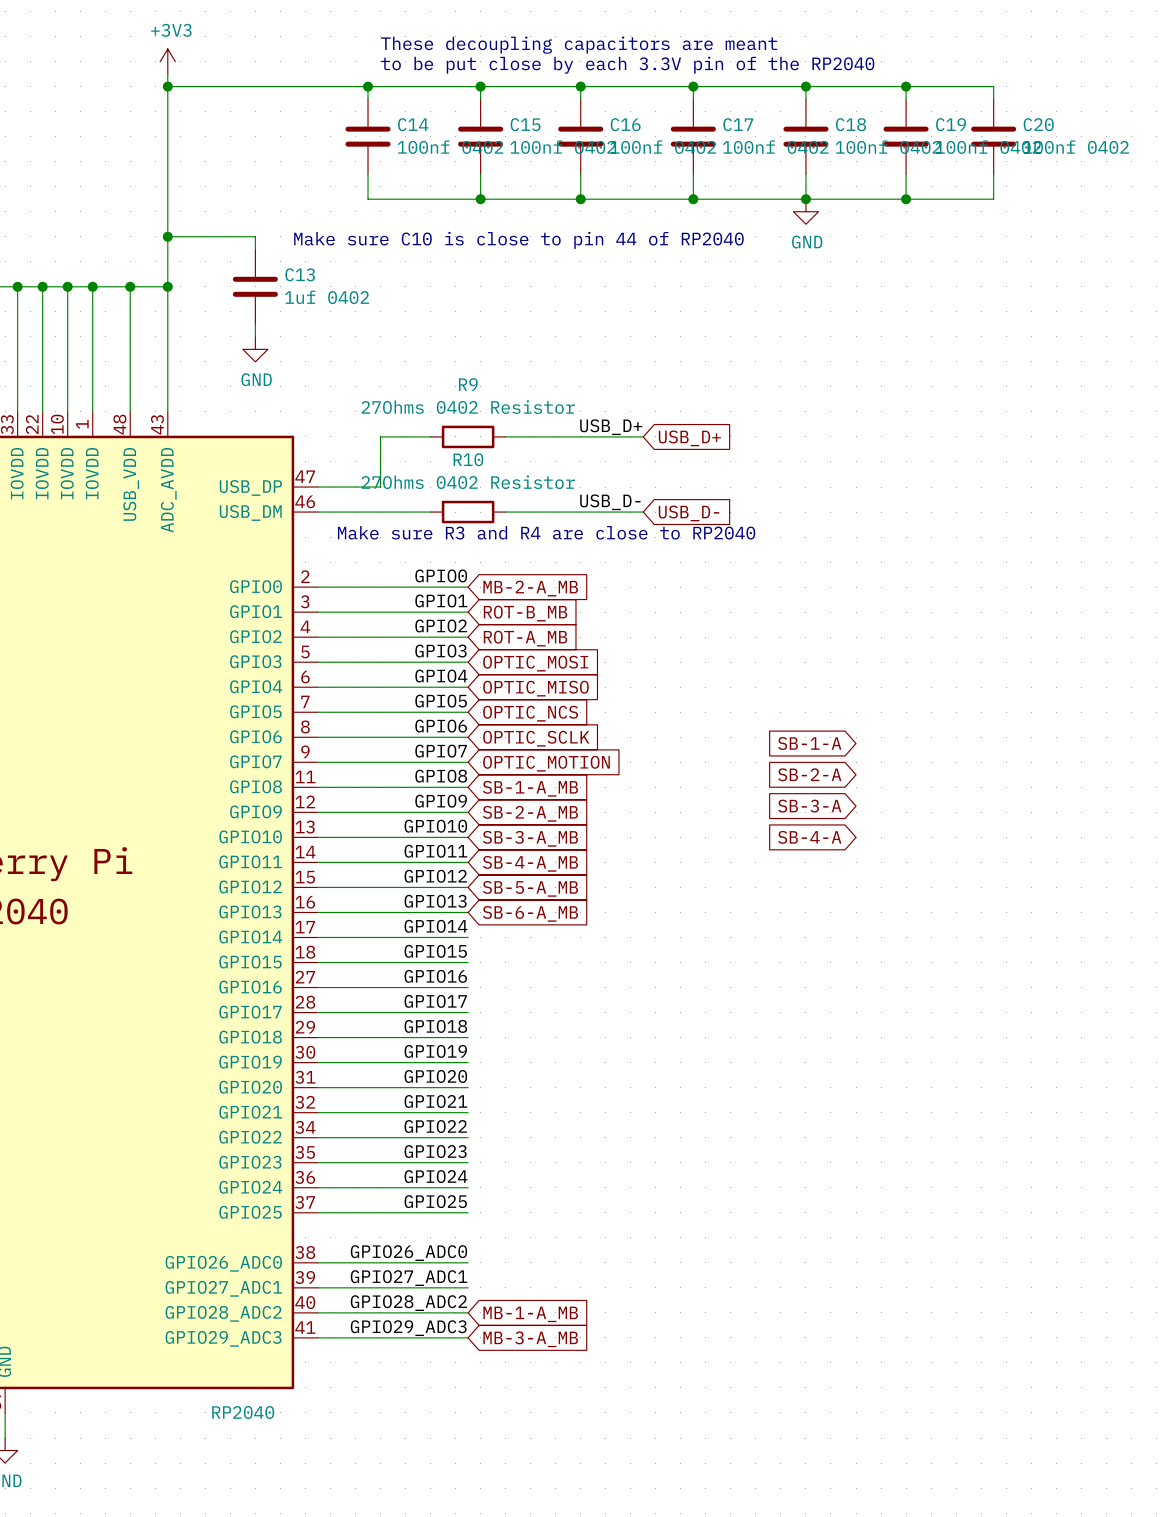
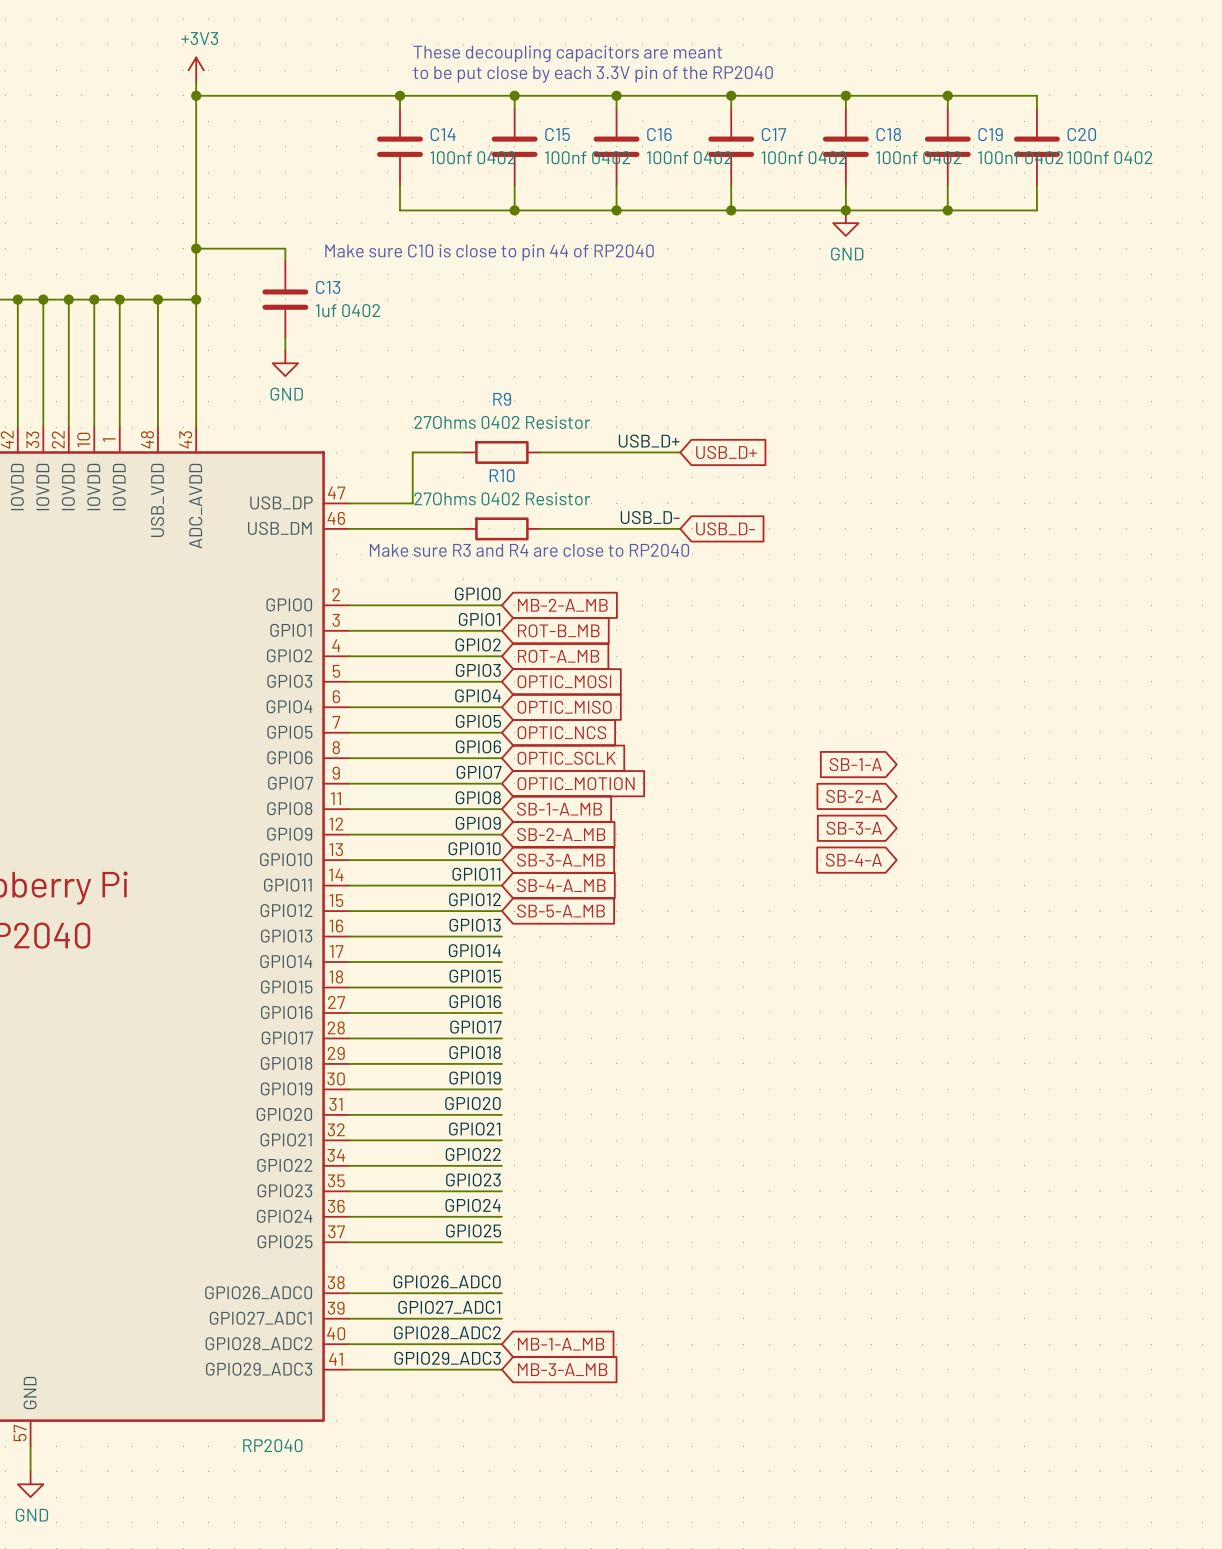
global label: SB-6-A_MB (530, 913) -> none

